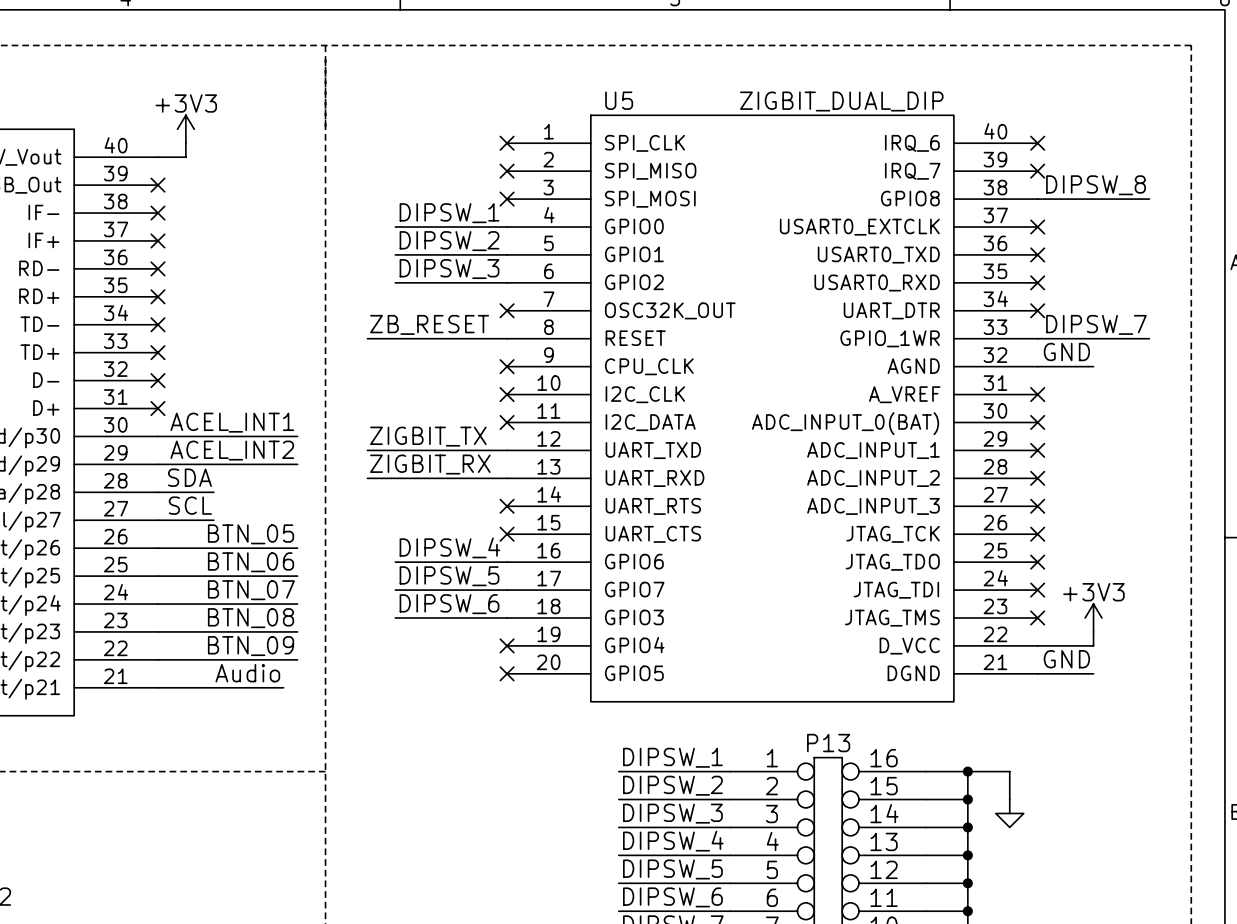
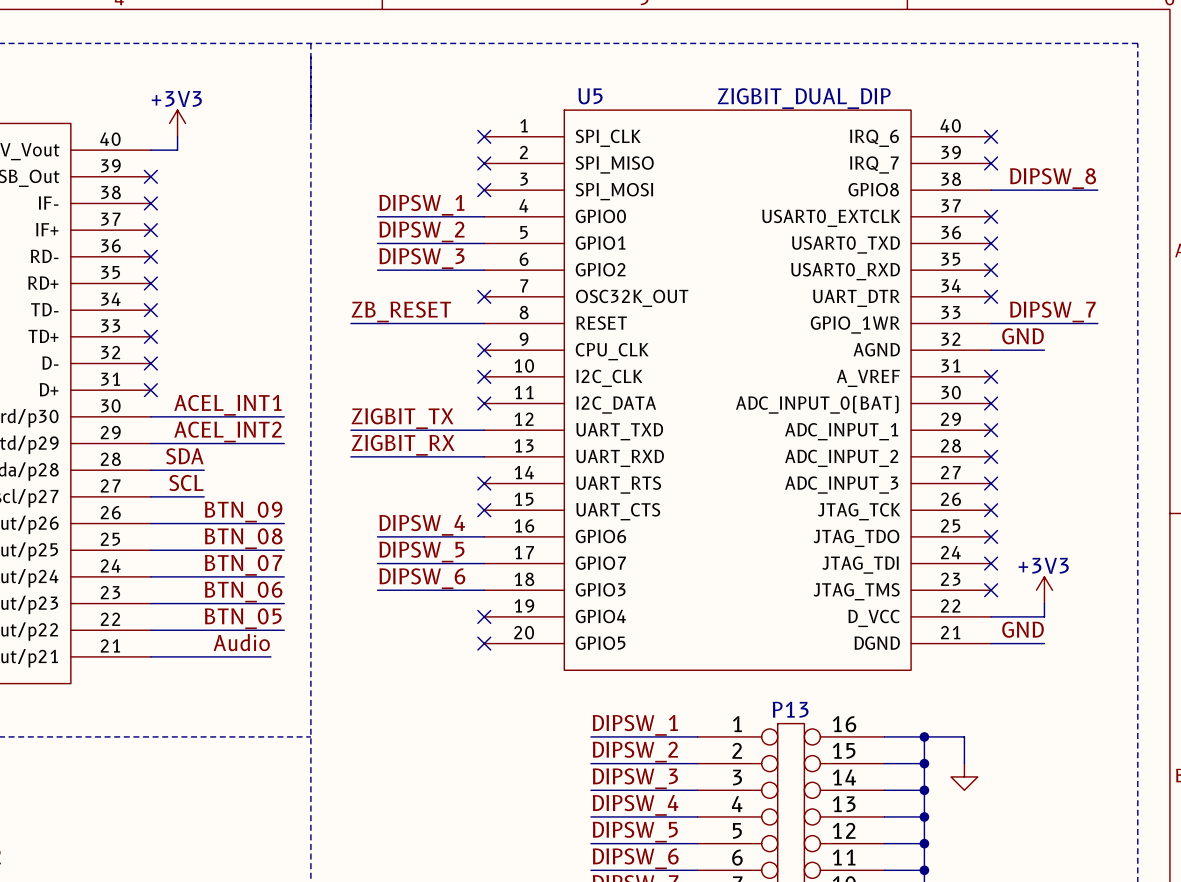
label: BTN_05 (251, 534) -> BTN_09 (243, 511)
label: BTN_06 (251, 562) -> BTN_08 (243, 538)
label: BTN_08 (251, 618) -> BTN_06 (243, 592)
label: BTN_09 (251, 646) -> BTN_05 (243, 618)

